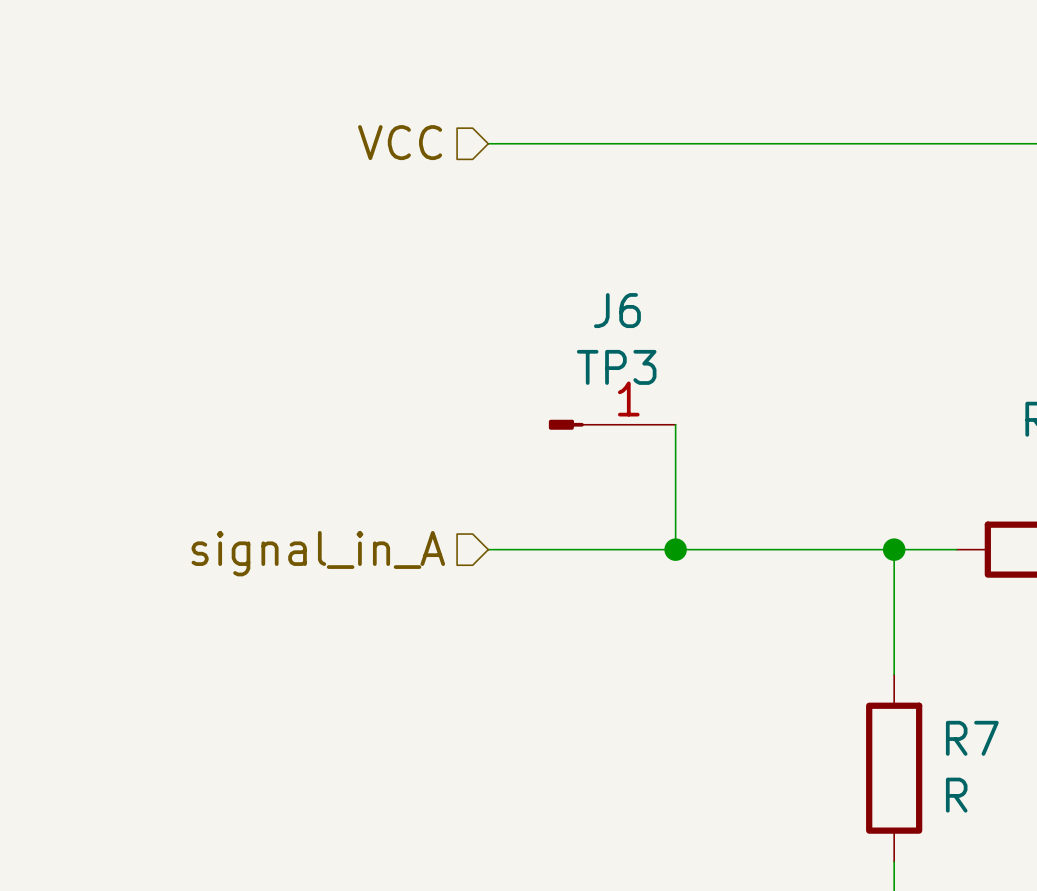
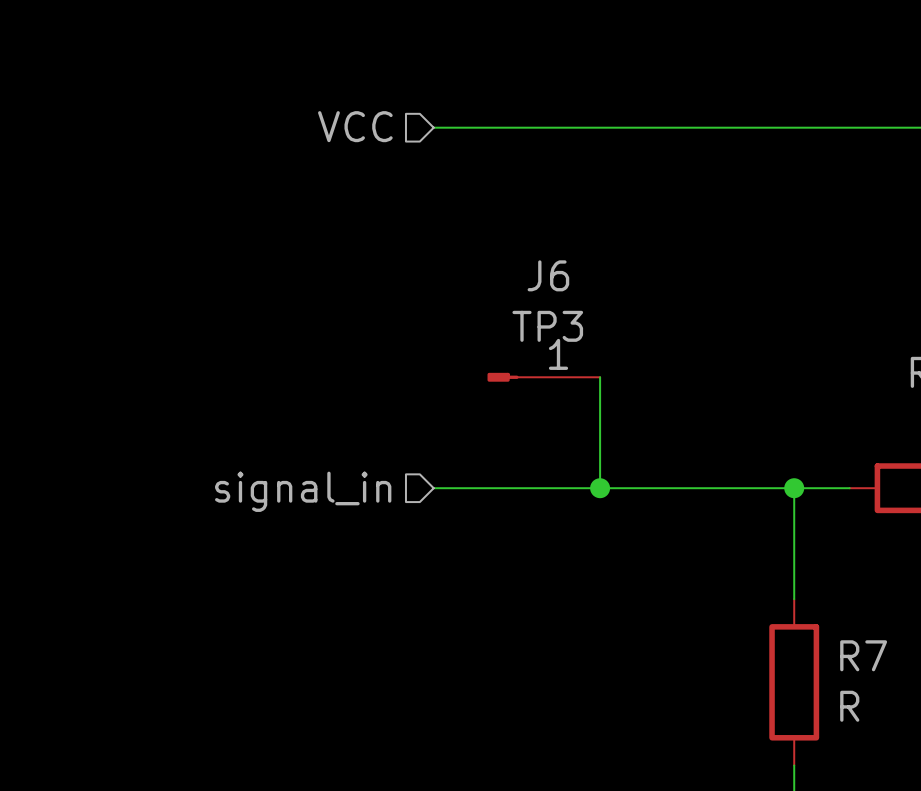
hierarchical label: signal_in_A (318, 553) -> signal_in (303, 491)

